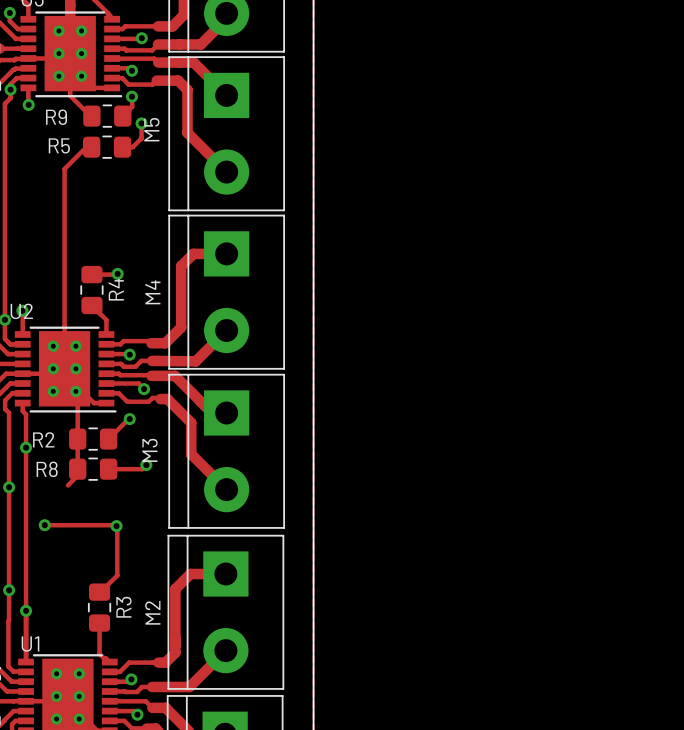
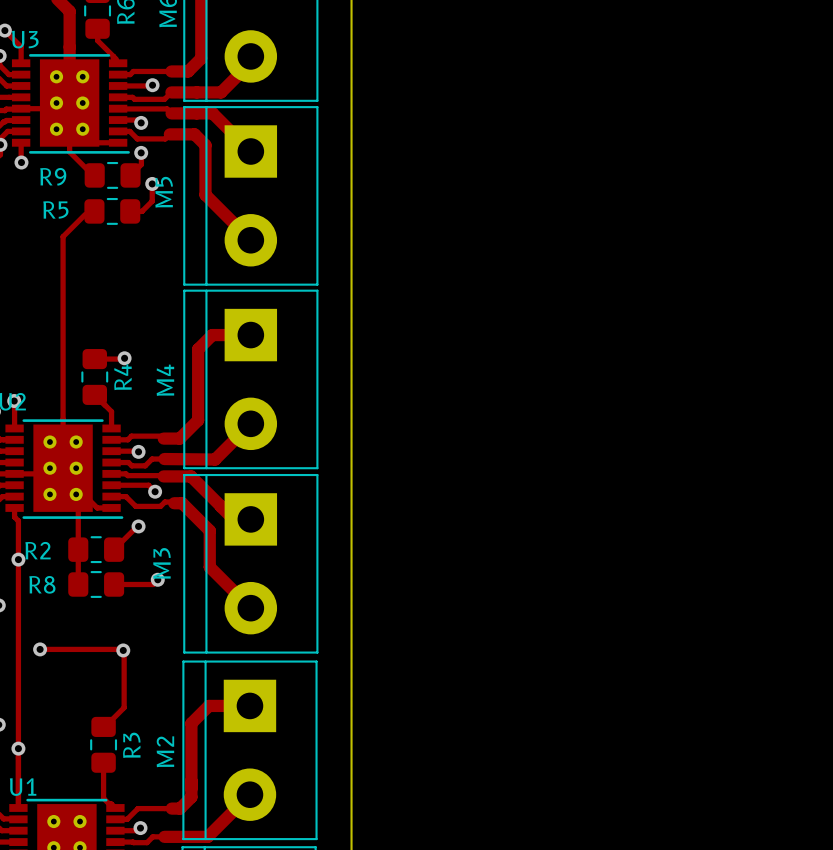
track: (77, 475) (67, 485) -> none

